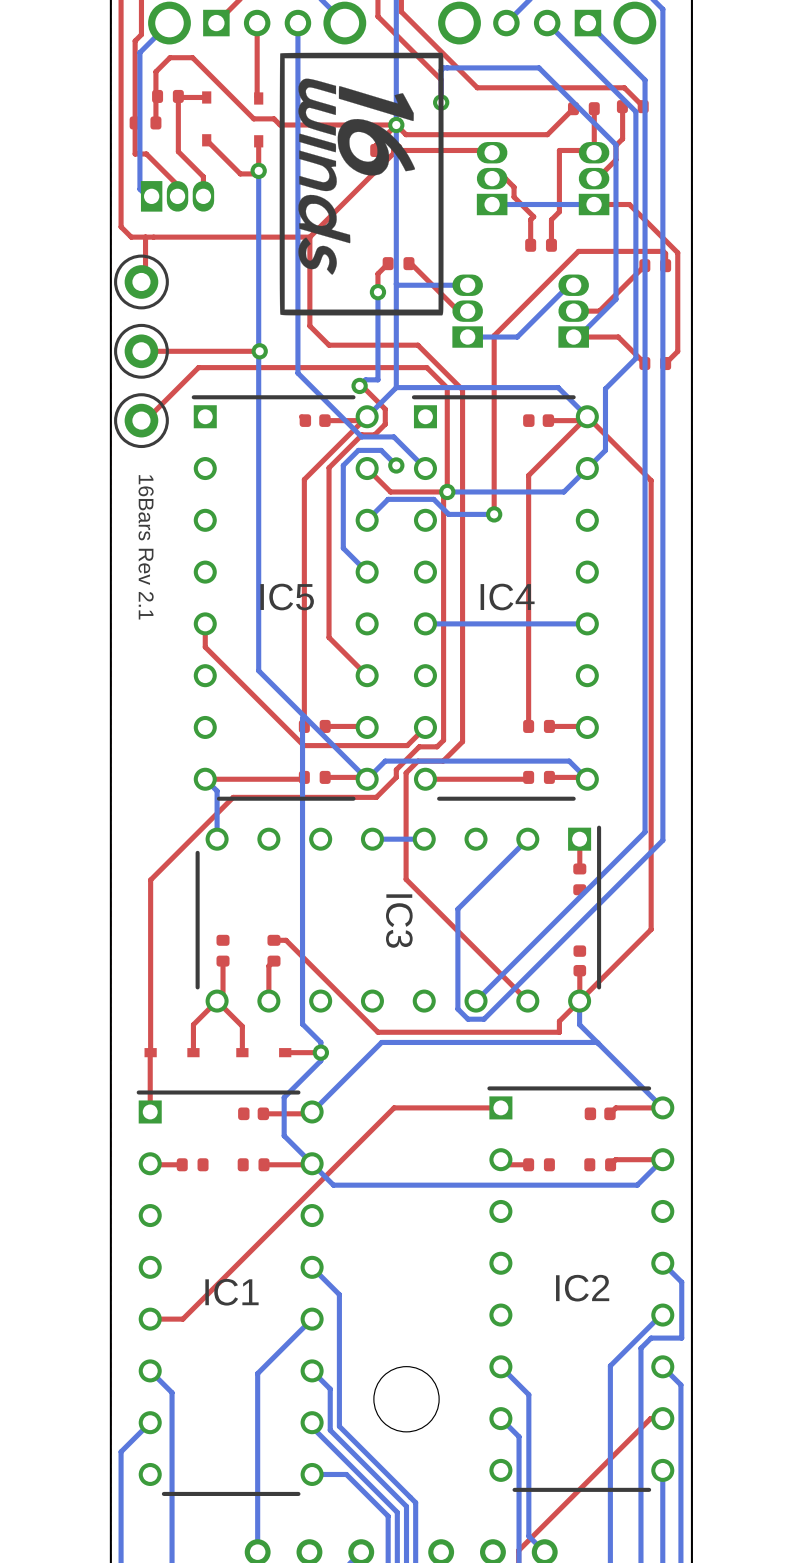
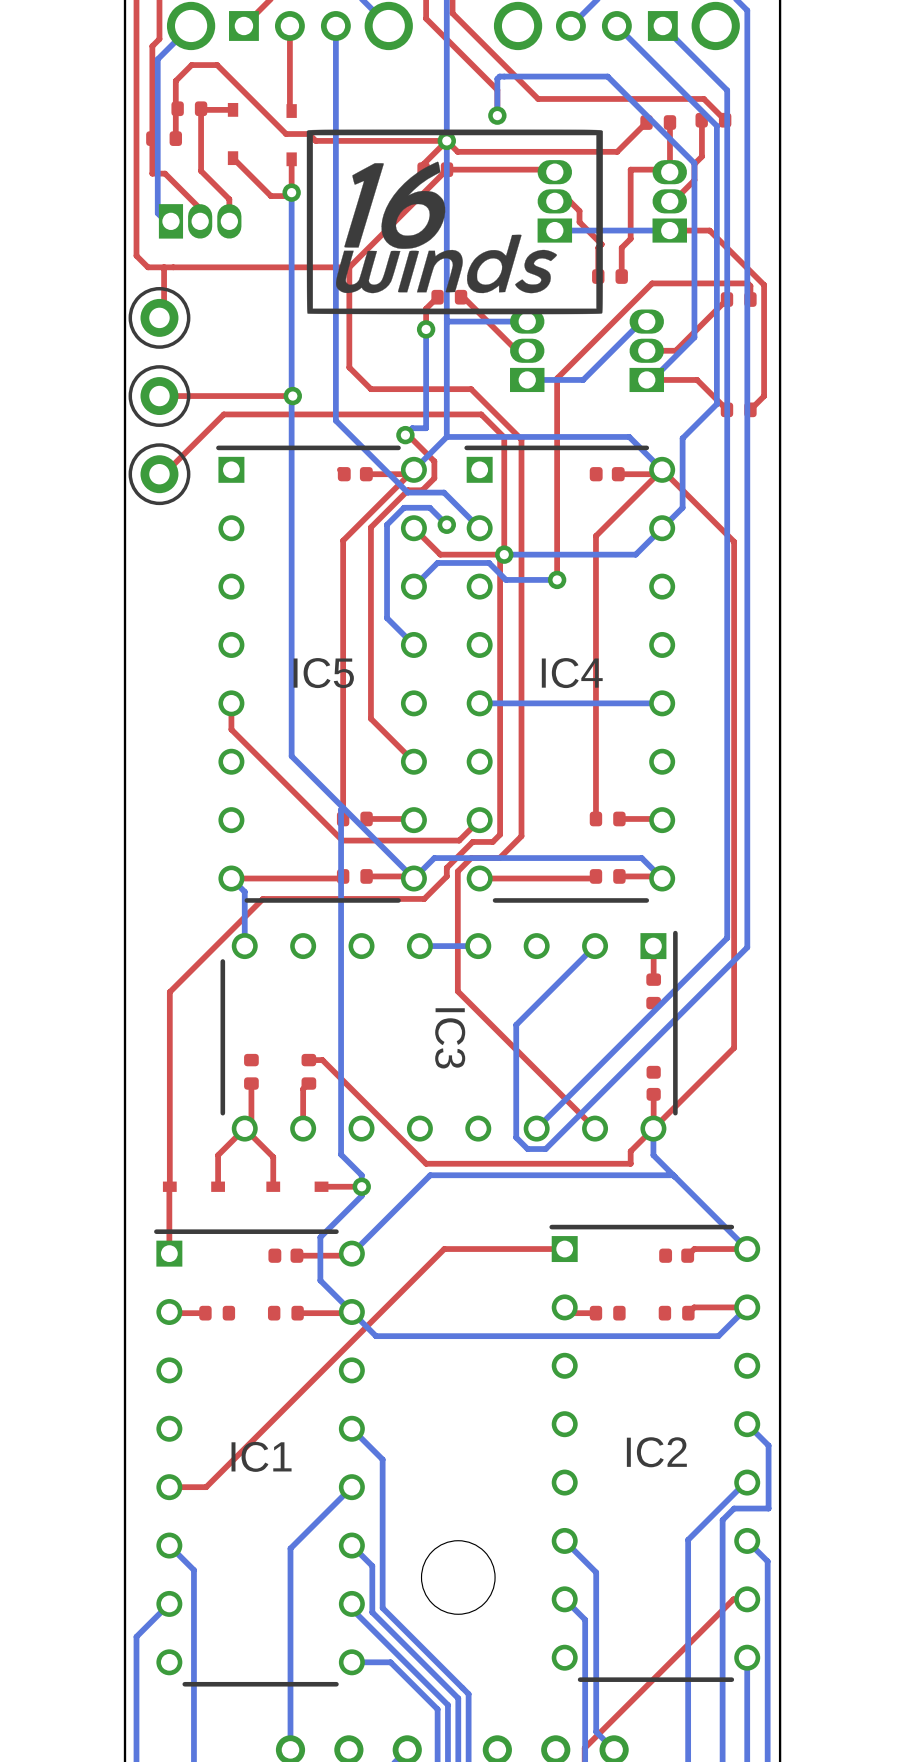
drawing: [279, 52, 444, 316] -> none
drawing: none -> [306, 129, 603, 315]
text: 16Bars Rev 2.1 (146, 547) -> none

